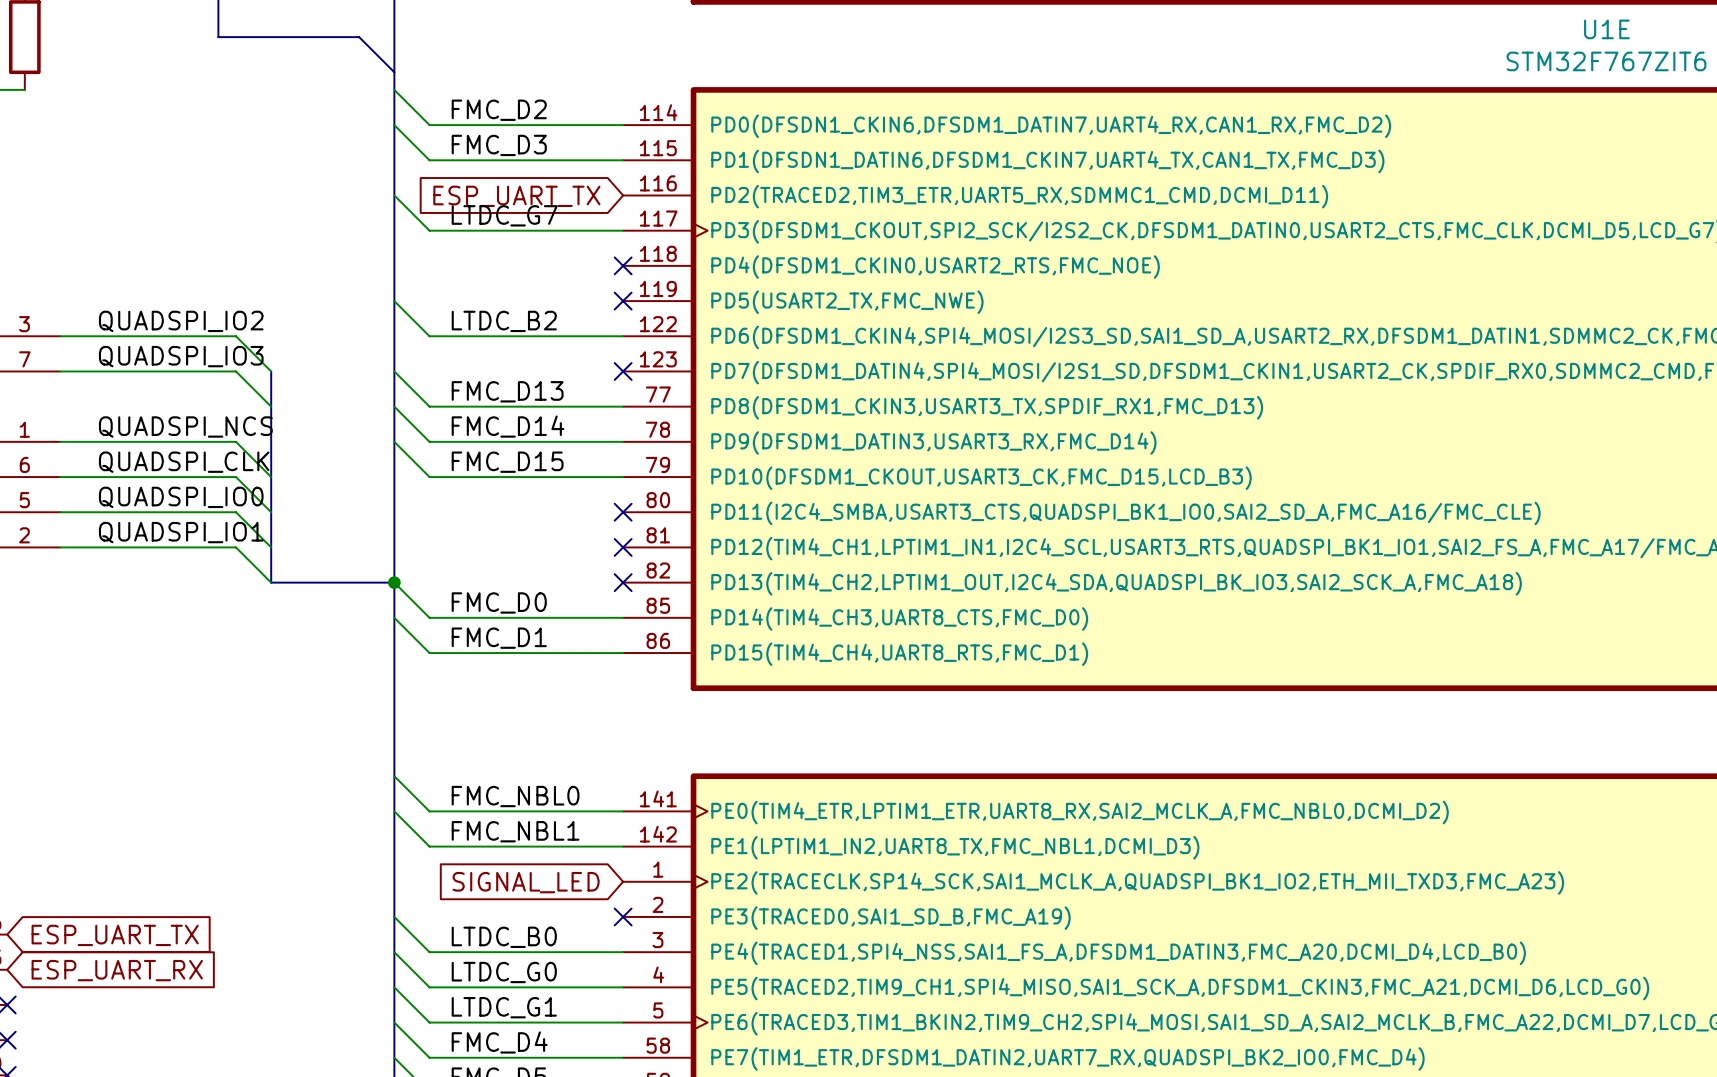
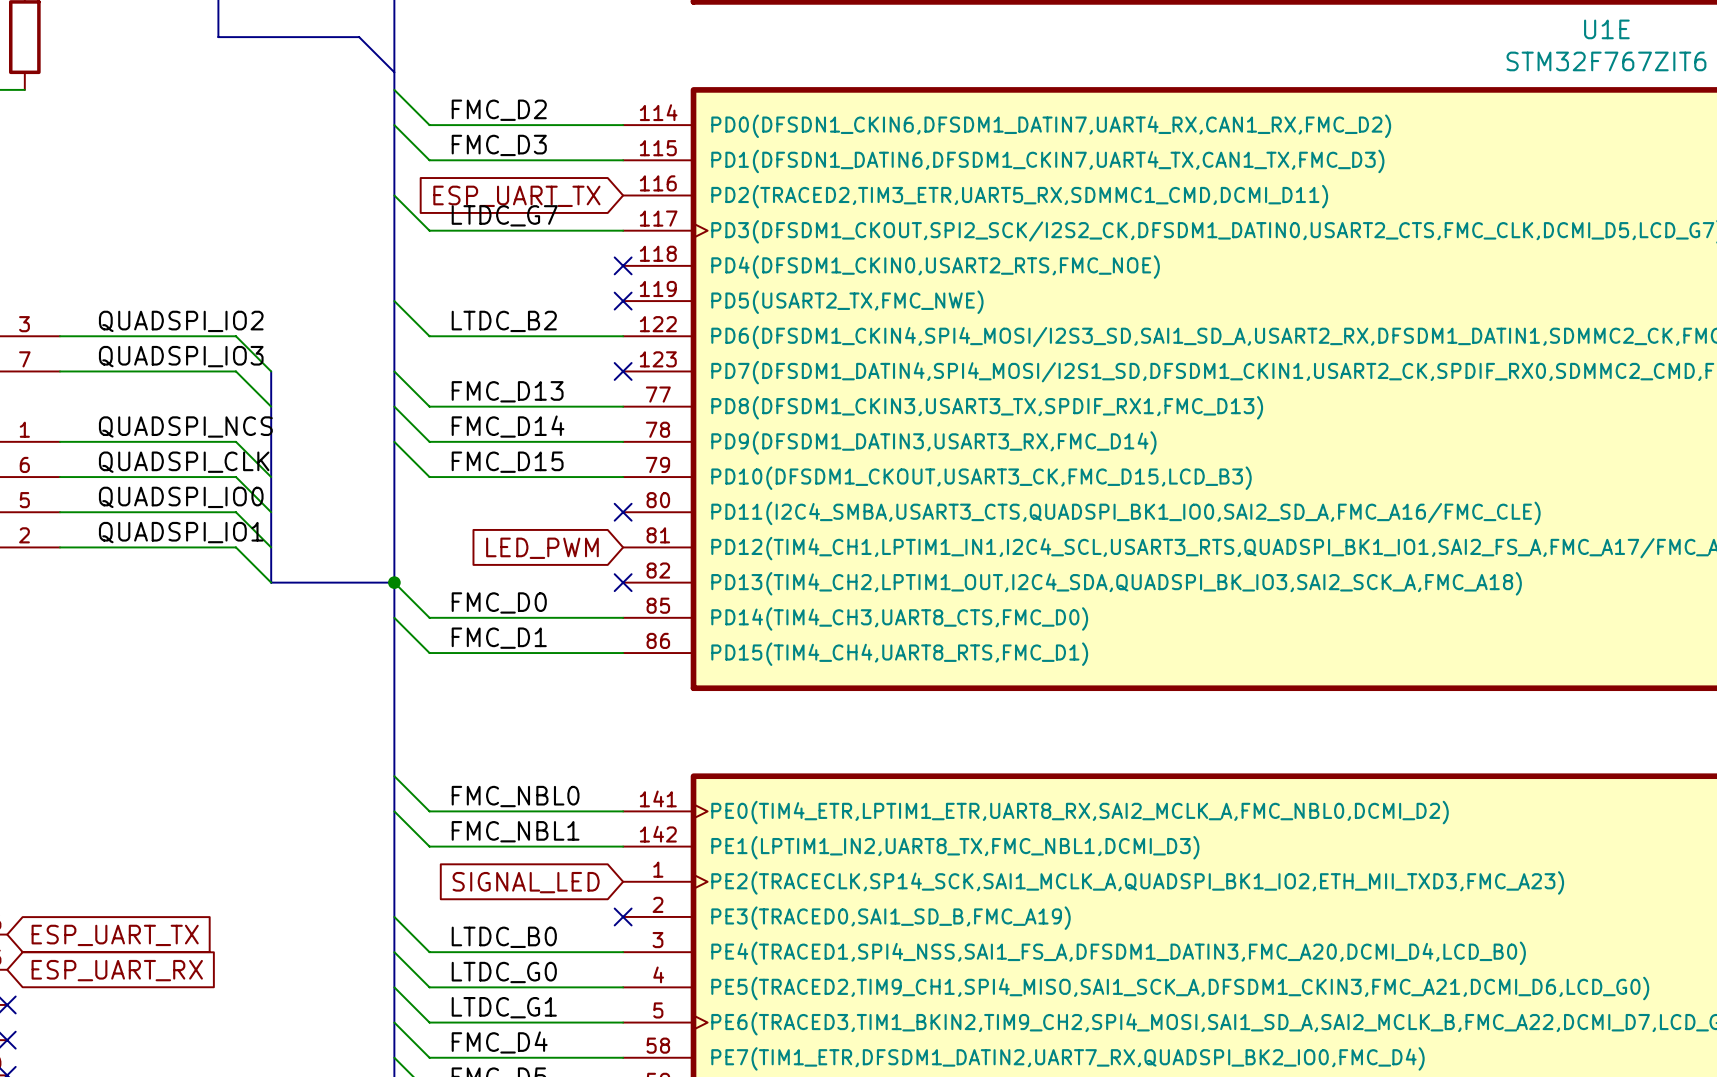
no-connect mark: (623, 547) -> none
global label: none -> LED_PWM (542, 548)

